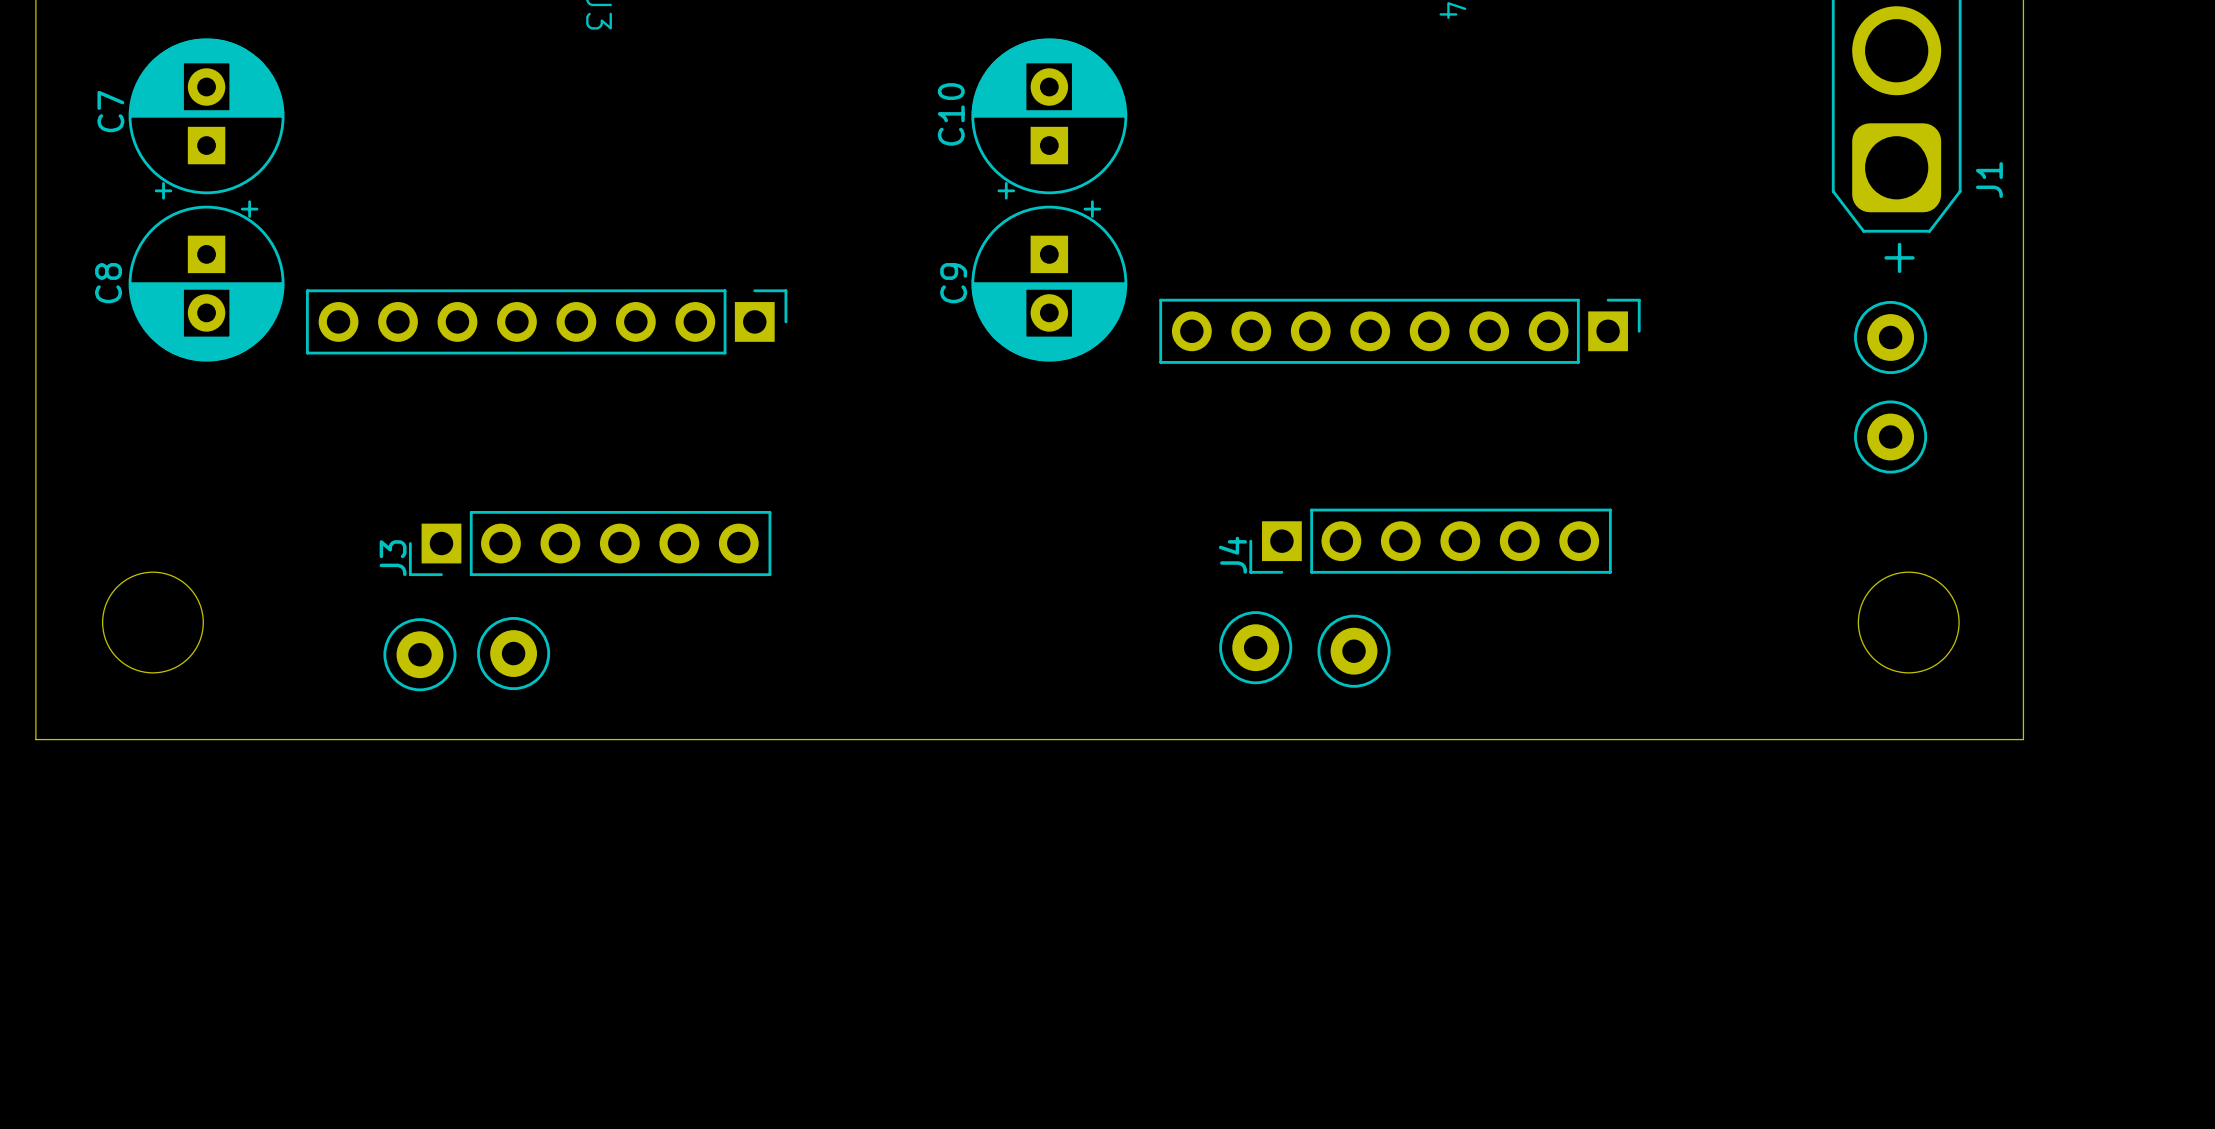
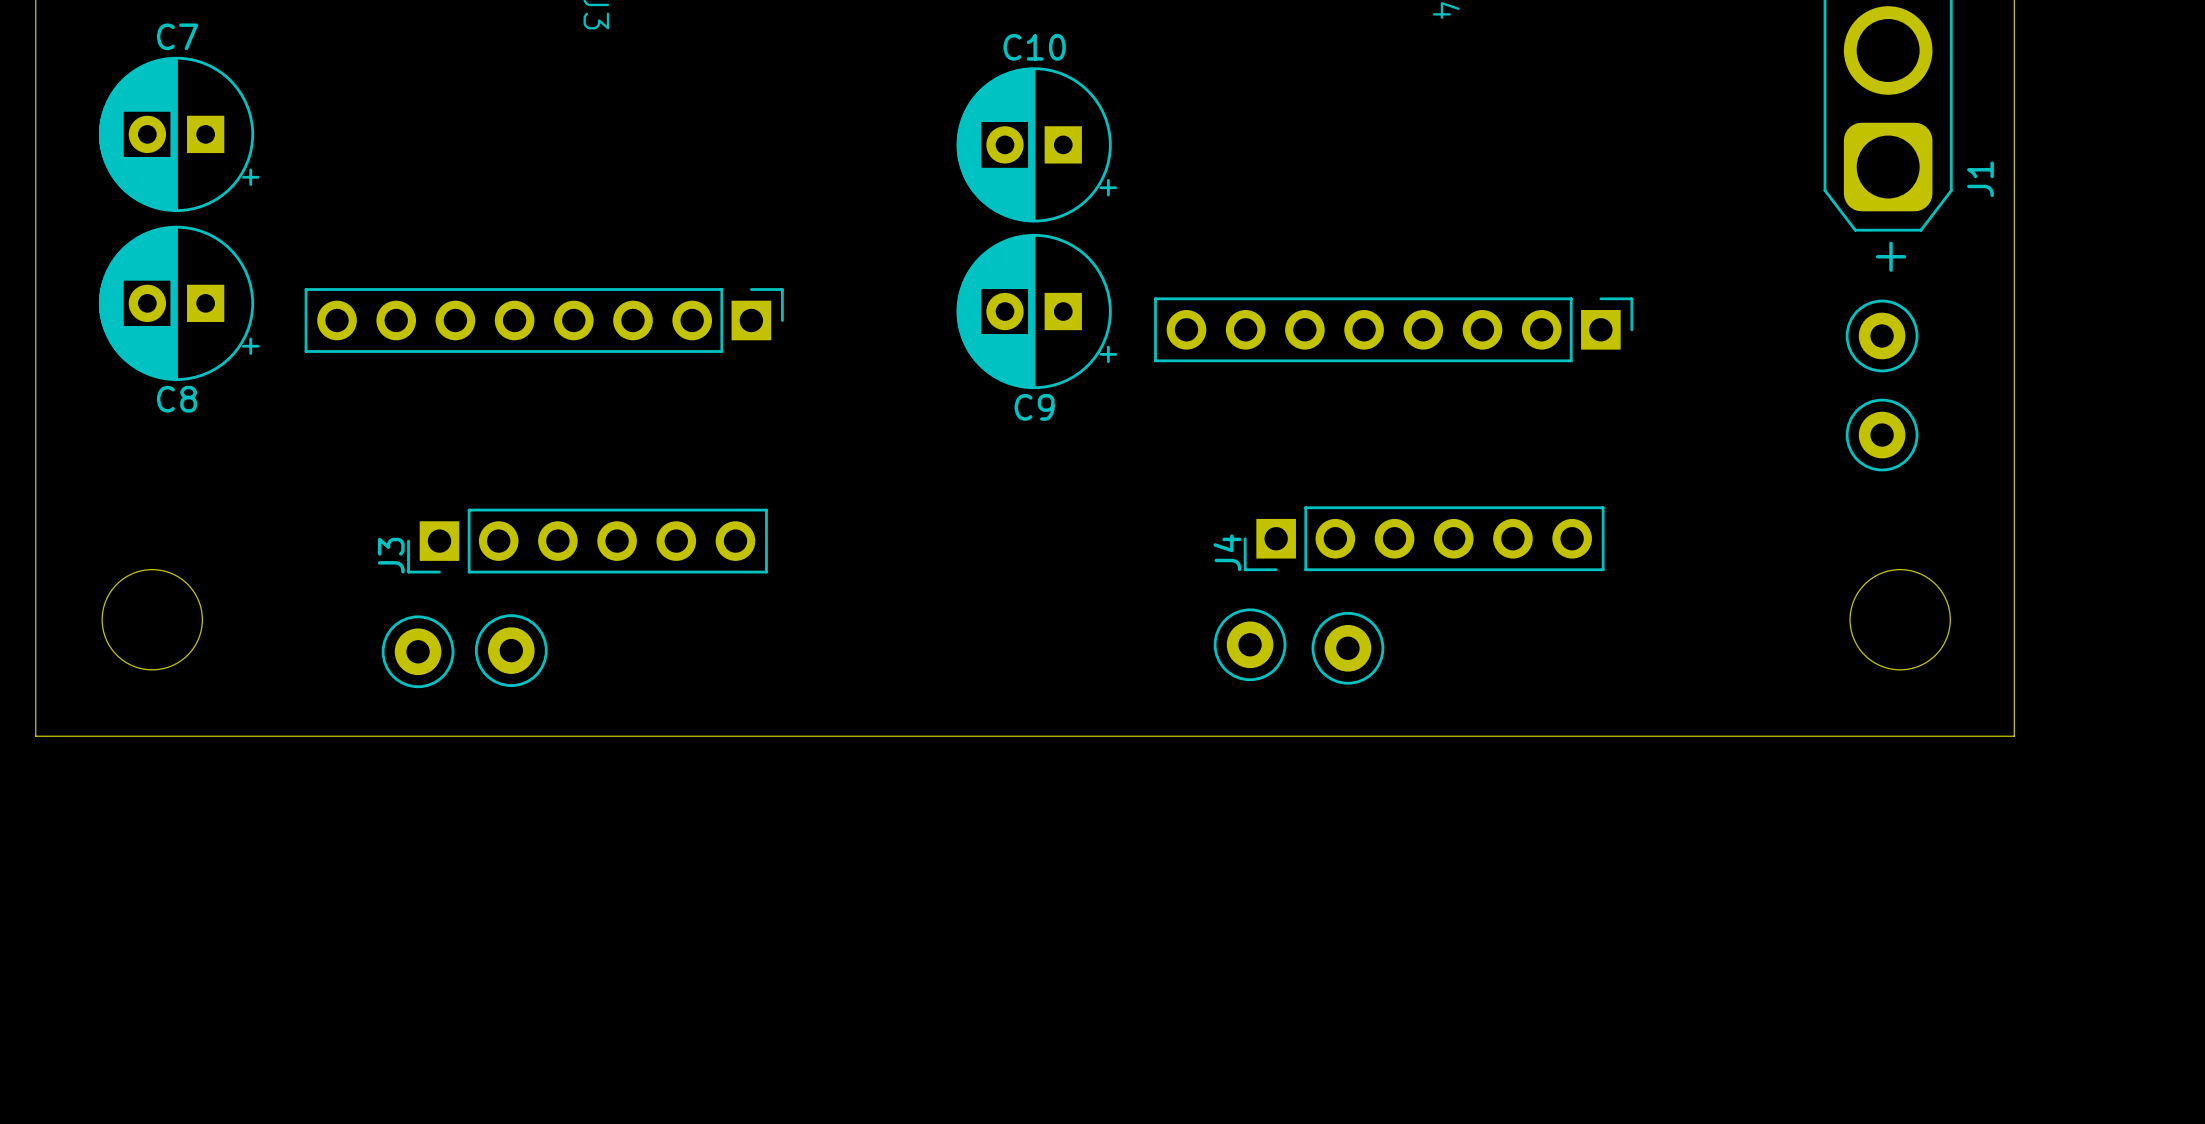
C7 name position: C7 (110, 111) -> C7 (177, 36)
C10 name position: C10 (951, 114) -> C10 (1034, 47)
C7 rotation: 0° (206, 118) -> 90° counterclockwise (179, 134)
C10 rotation: 0° (1049, 118) -> 90° counterclockwise (1036, 144)
C8 rotation: 0° (206, 280) -> 90° clockwise (179, 303)
C9 rotation: 0° (1049, 280) -> 90° clockwise (1036, 311)
C8 name position: C8 (108, 283) -> C8 (176, 399)
C9 name position: C9 (953, 283) -> C9 (1034, 407)

